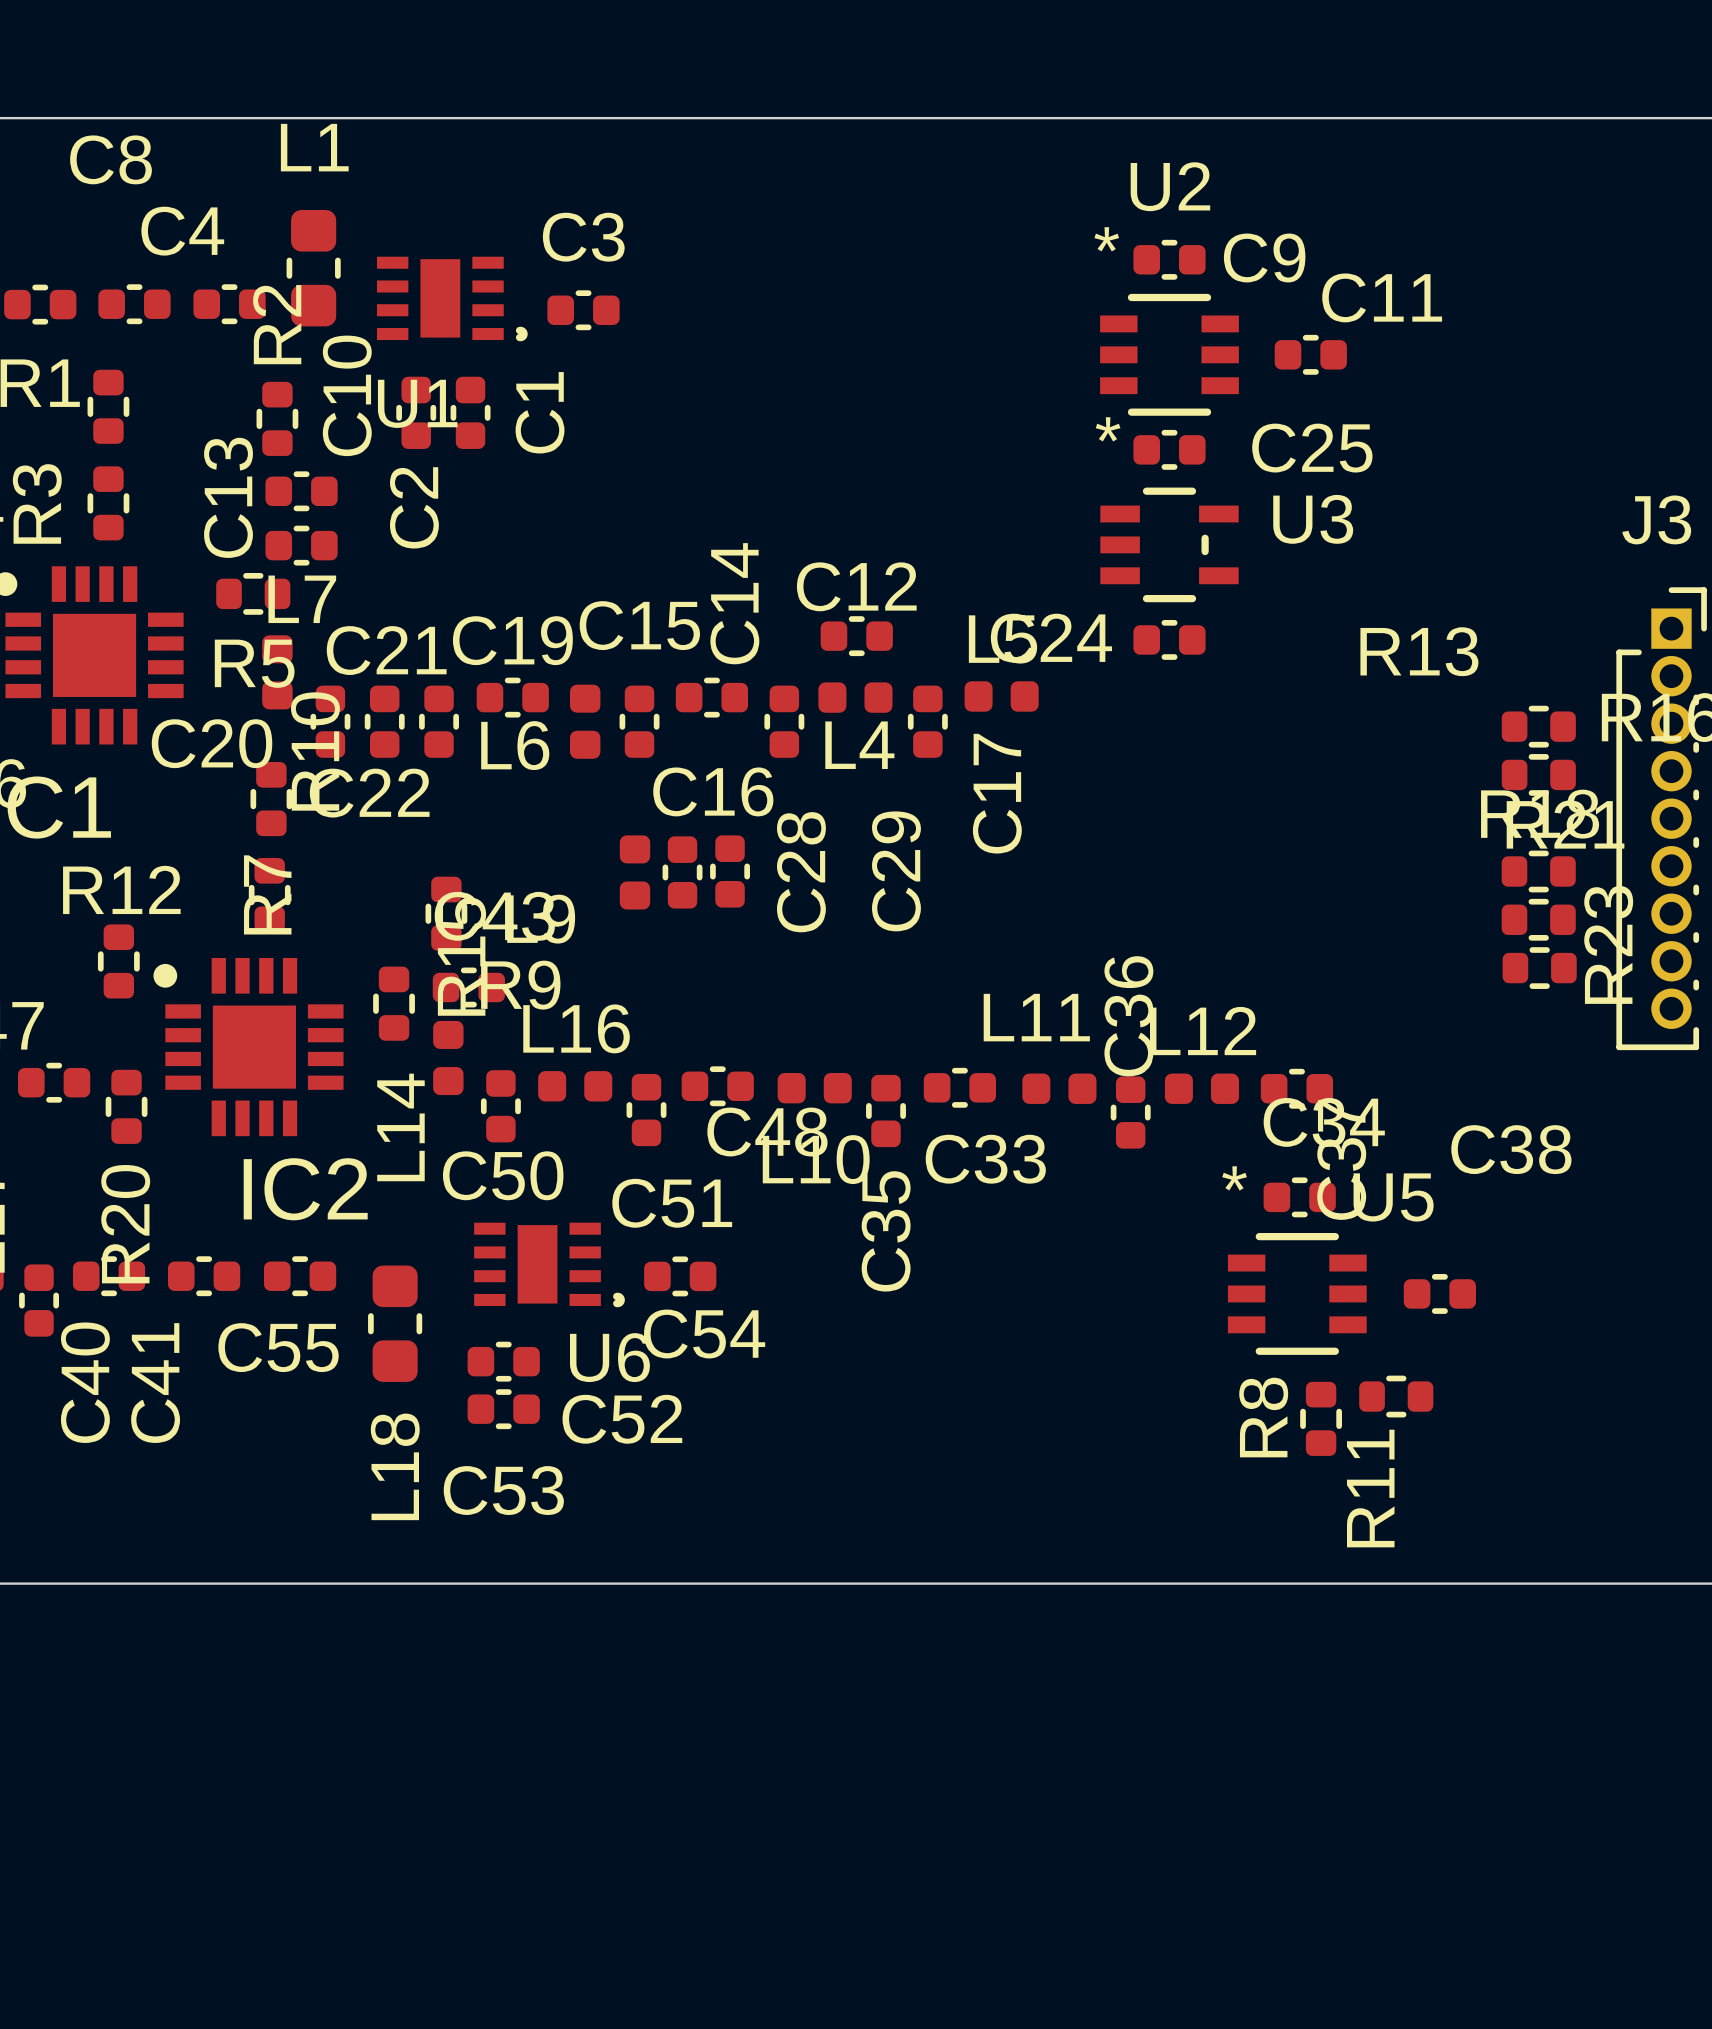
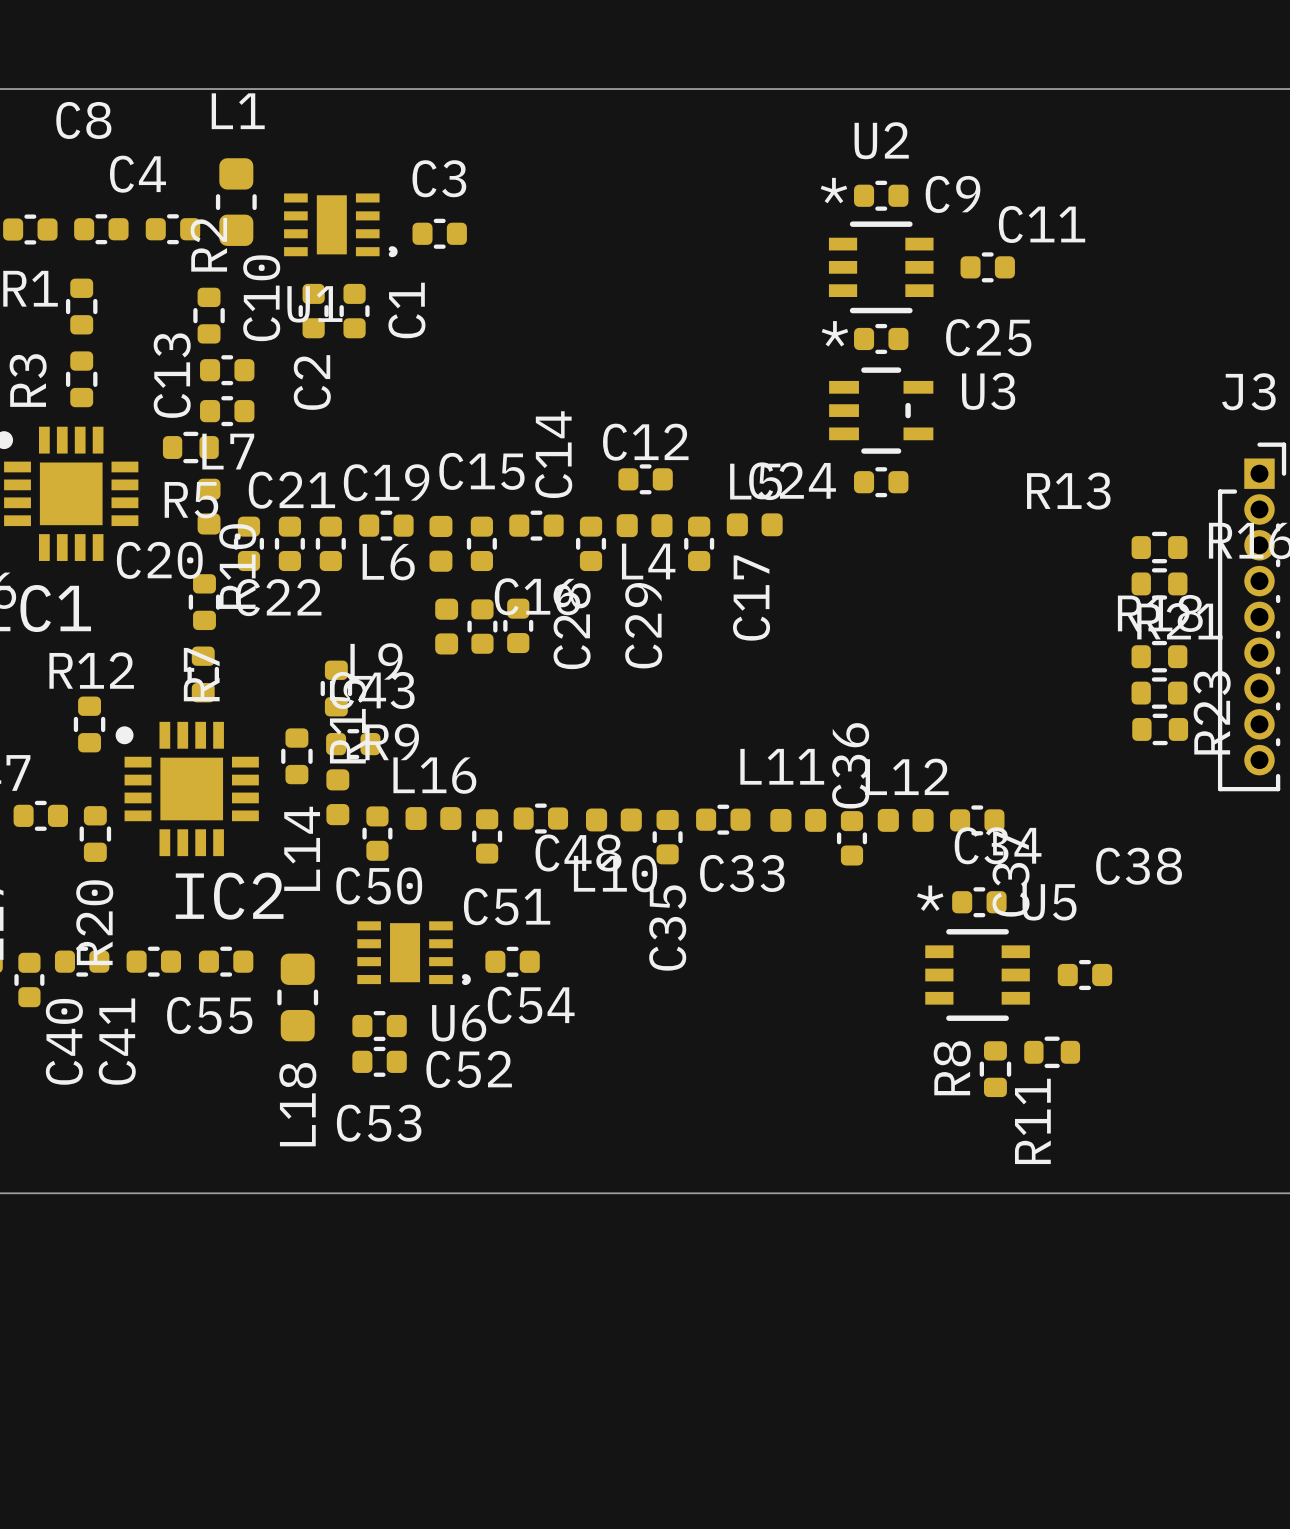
C29 position: (730, 871) -> (518, 625)
L9 position: (635, 872) -> (446, 626)
C28 position: (682, 872) -> (482, 626)

